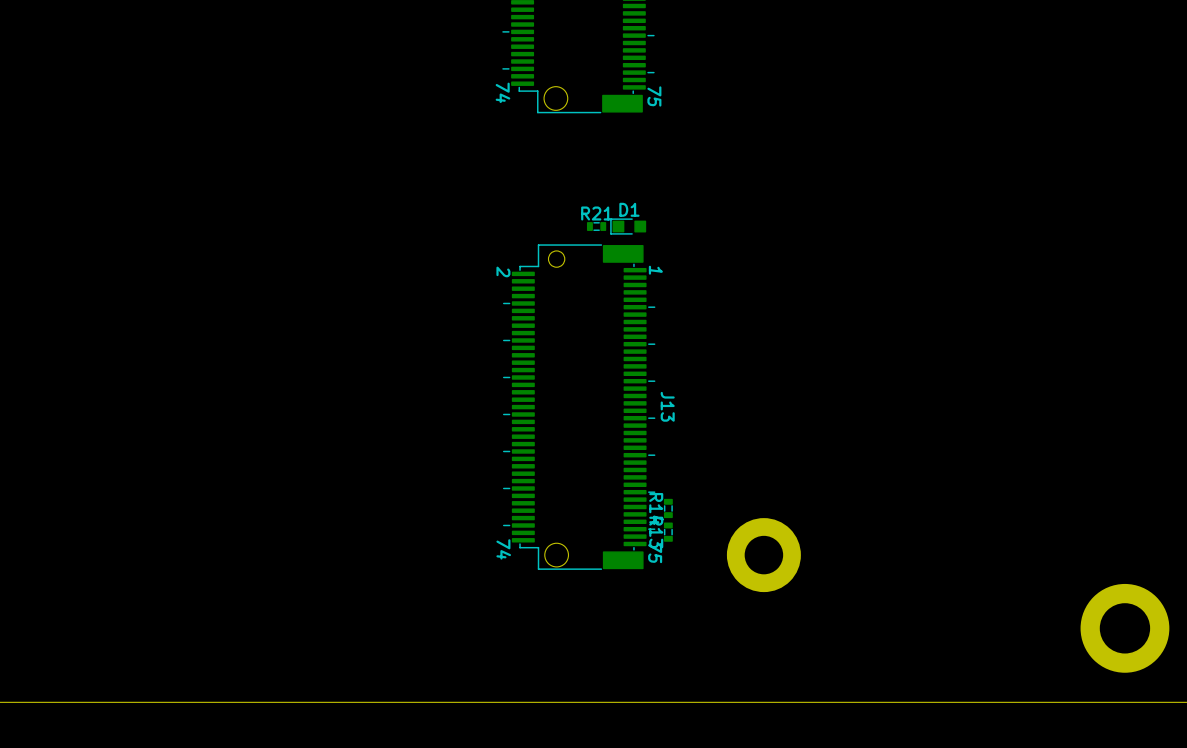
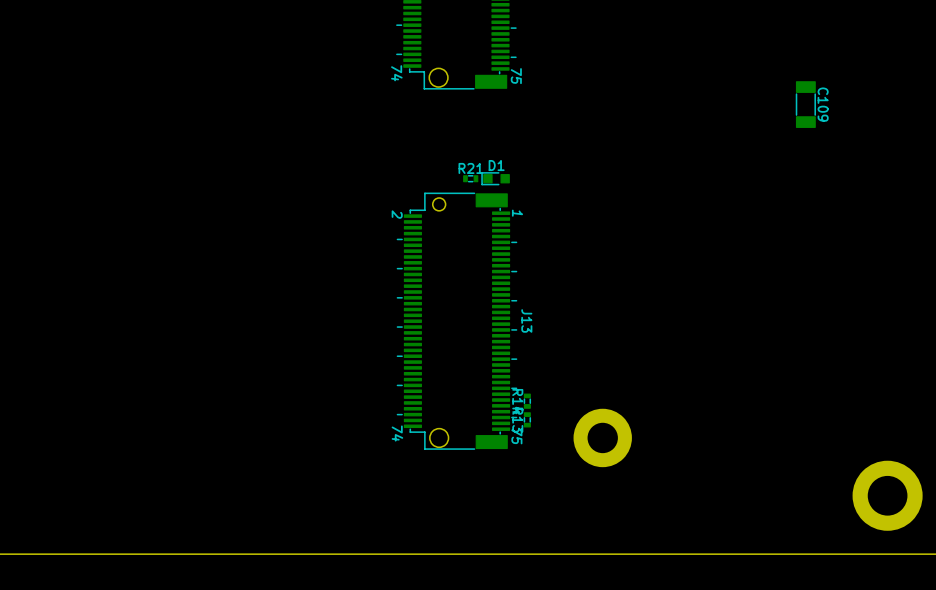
C109: none -> (805, 104)

